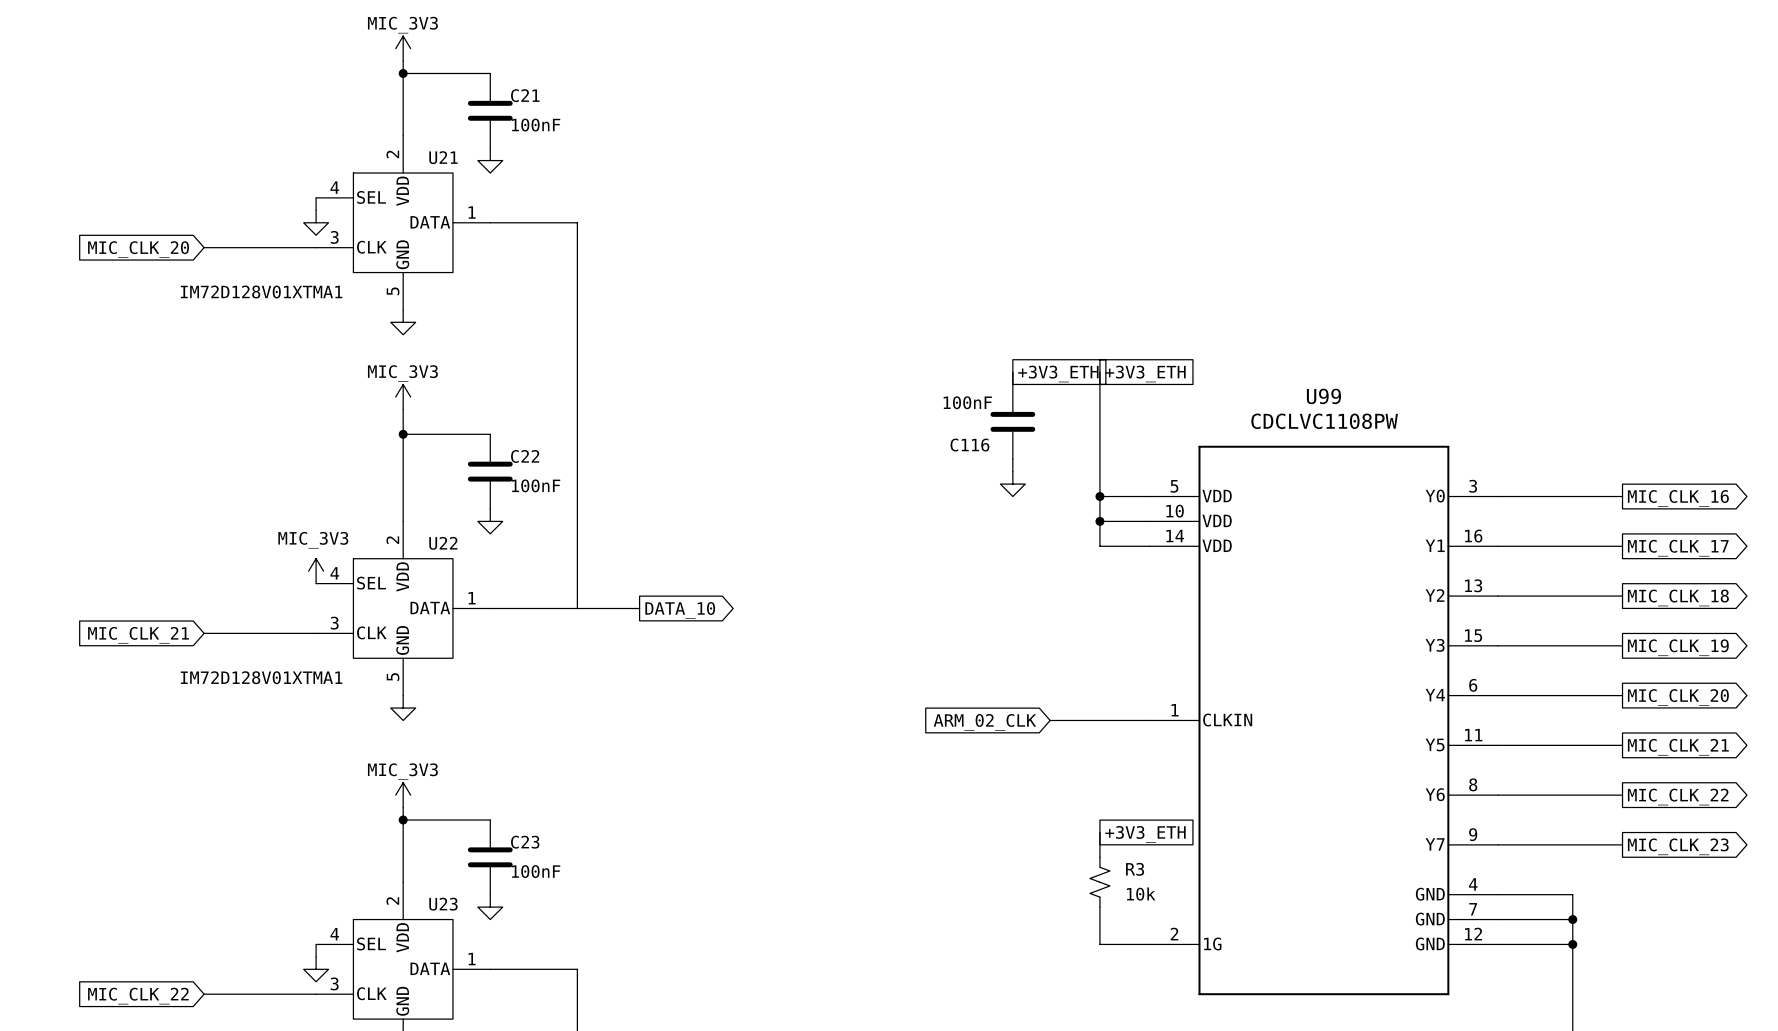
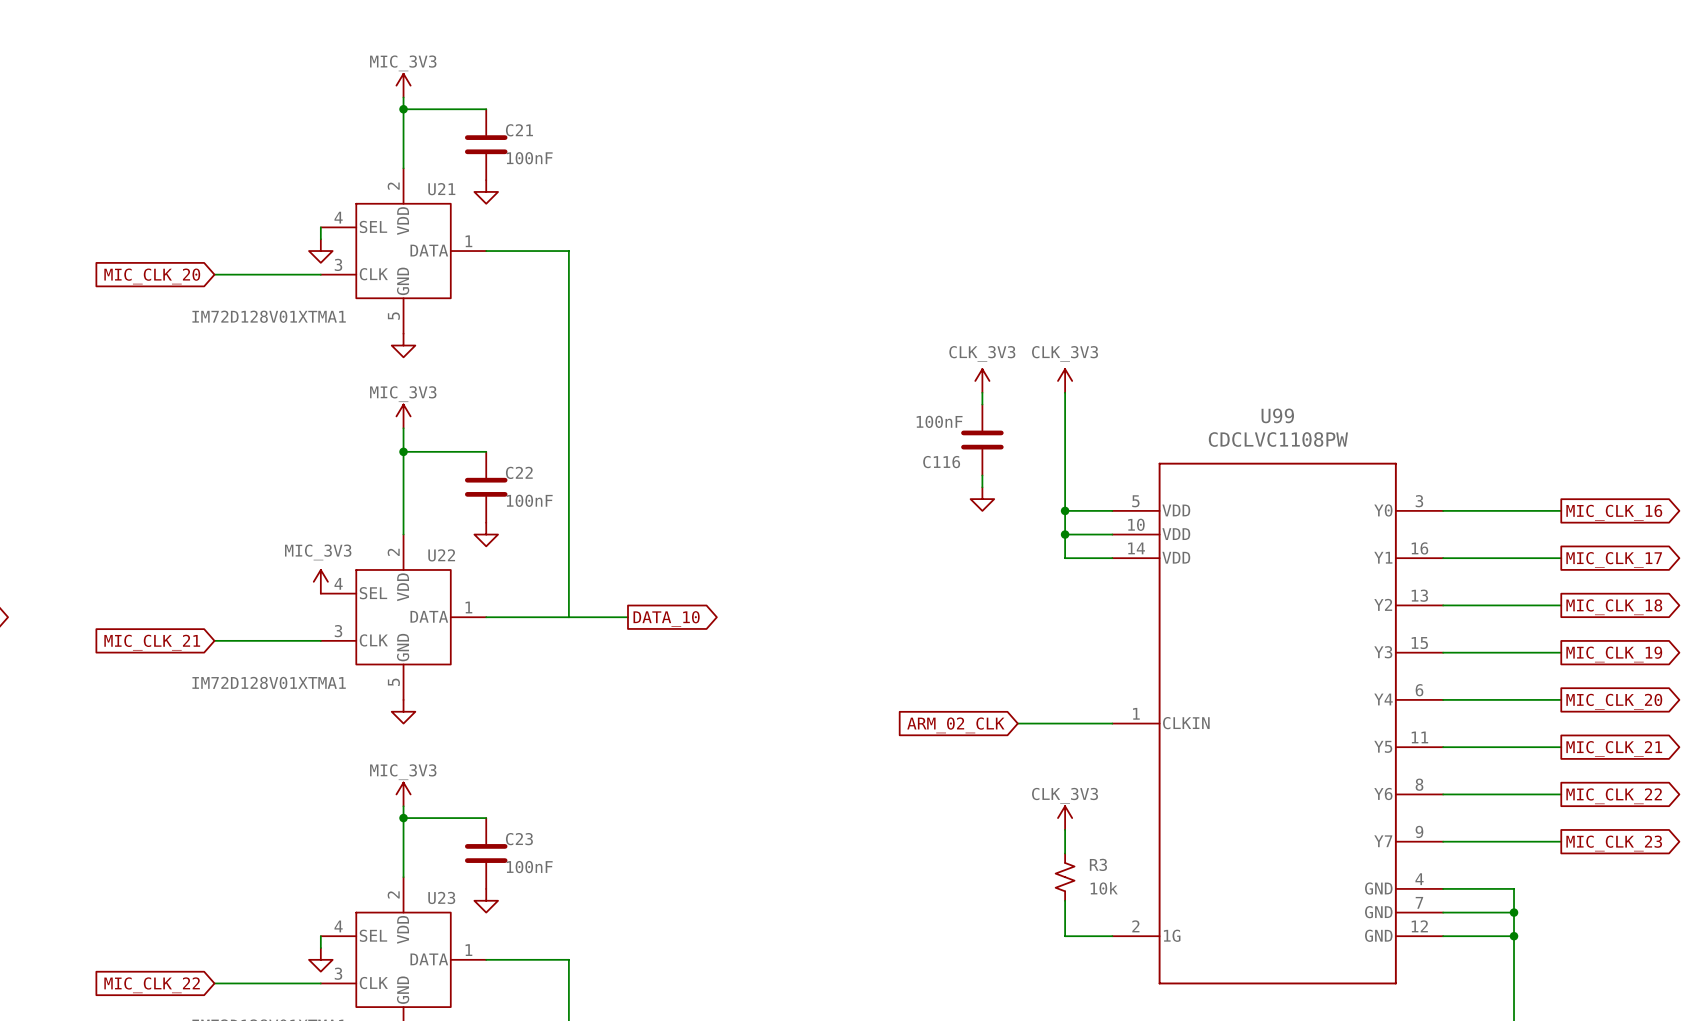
power symbol: none -> CLK_3V3 (982, 380)
power symbol: none -> CLK_3V3 (1065, 380)
global label: +3V3_ETH (1058, 373) -> none
global label: +3V3_ETH (1145, 373) -> none
power symbol: none -> CLK_3V3 (1065, 818)
global label: +3V3_ETH (1145, 834) -> none

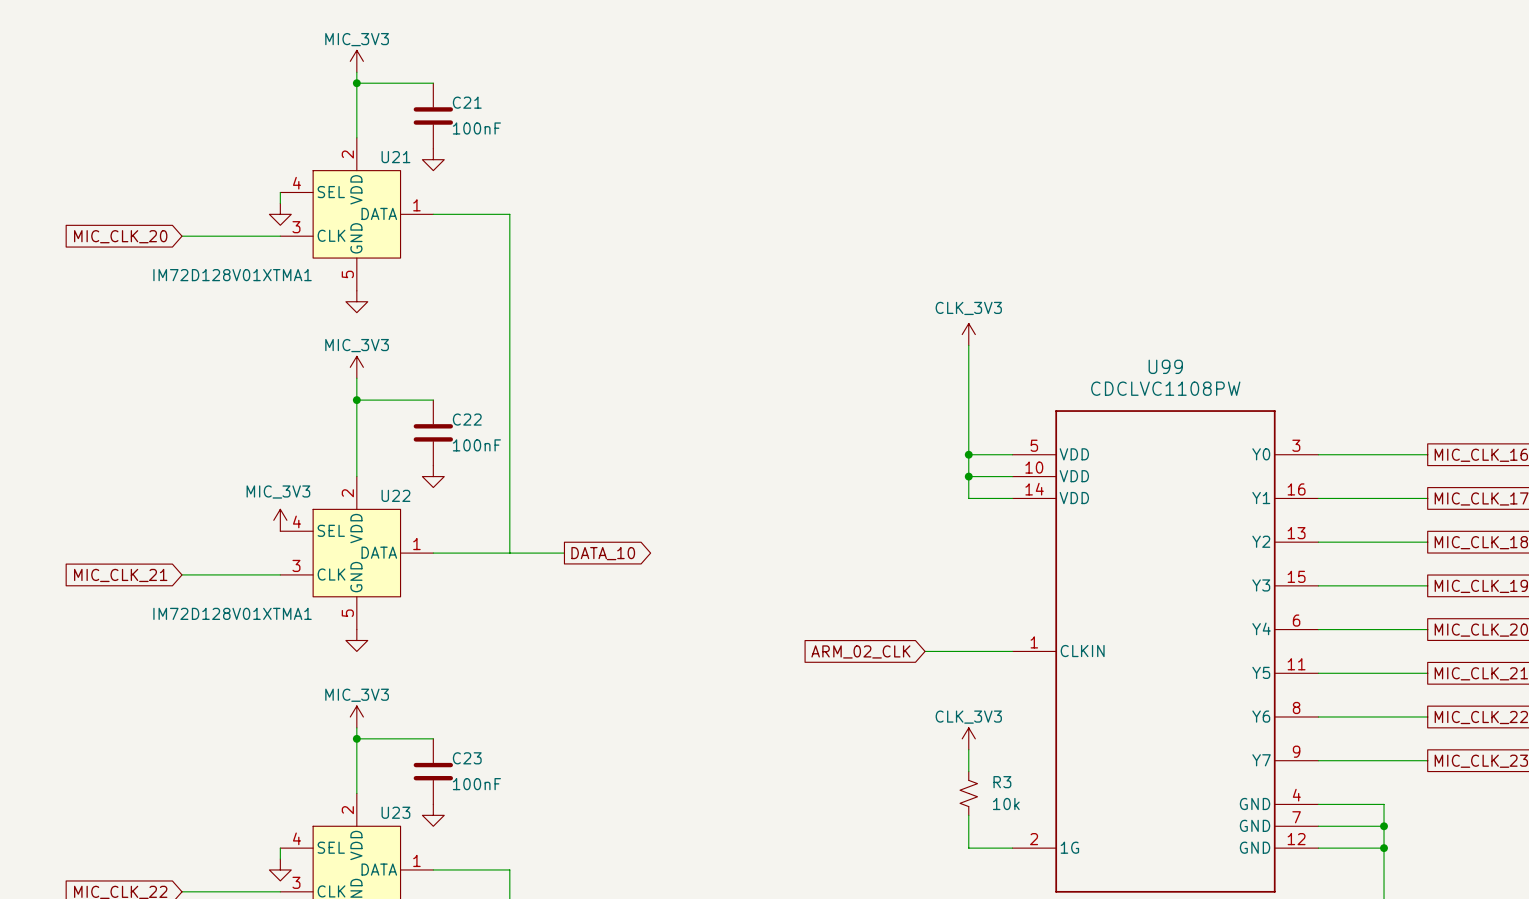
power symbol: CLK_3V3 (982, 380) -> none
wire: (982, 392) (982, 404) -> none
C116: 100nF (982, 440) -> none
wire: (982, 475) (982, 487) -> none
power symbol: (982, 499) -> none

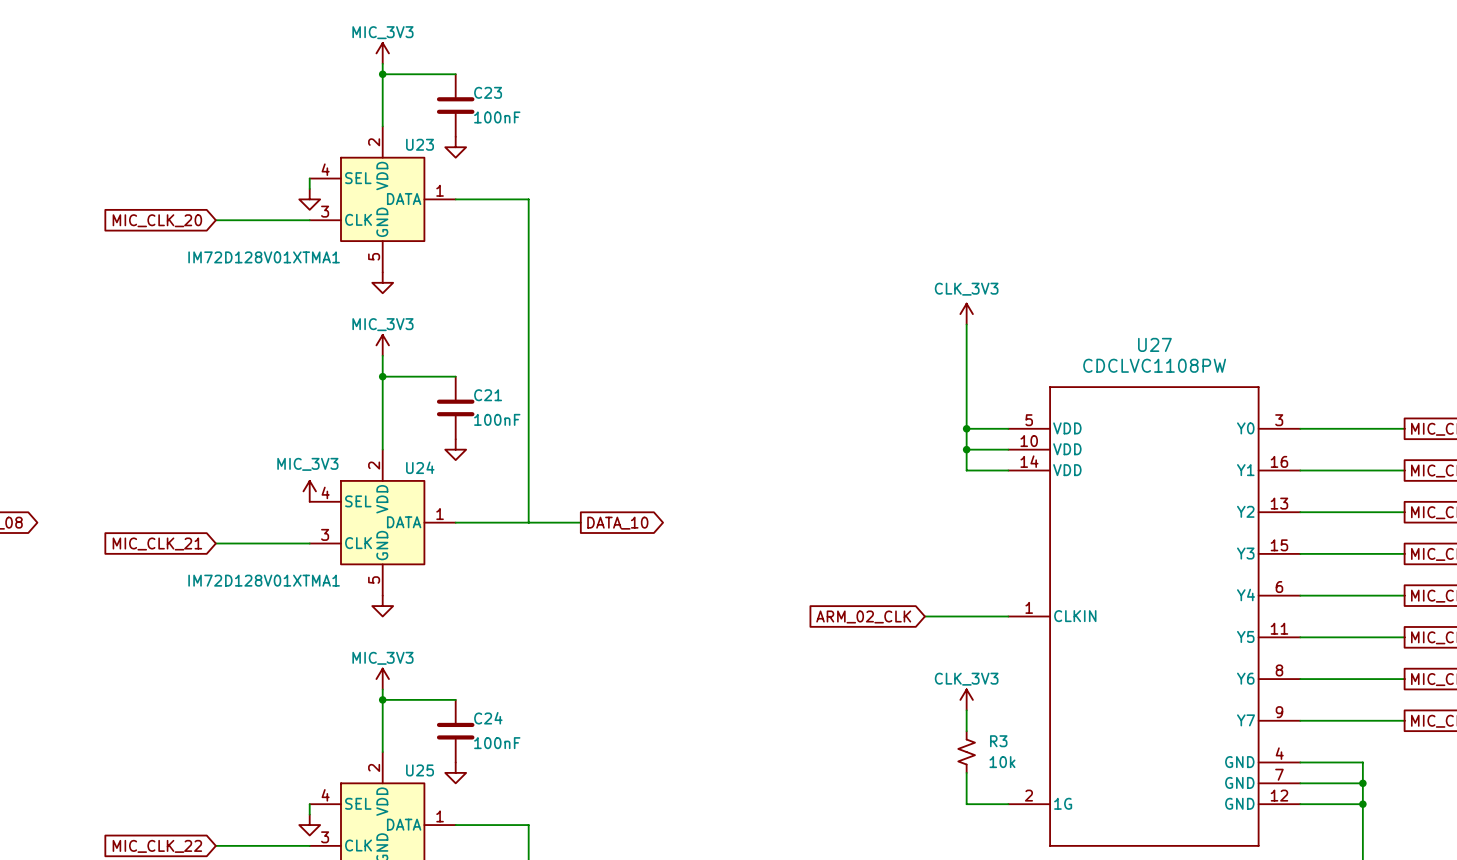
C21 name: C21 (467, 102) -> C23 (488, 92)
U21 name: U21 (395, 157) -> U23 (420, 144)
U99 name: U99 (1165, 366) -> U27 (1154, 344)
C22 name: C22 (467, 419) -> C21 (488, 395)
U22 name: U22 (395, 495) -> U24 (420, 467)
C23 name: C23 (467, 758) -> C24 (488, 718)
U23 name: U23 (395, 812) -> U25 (420, 770)

